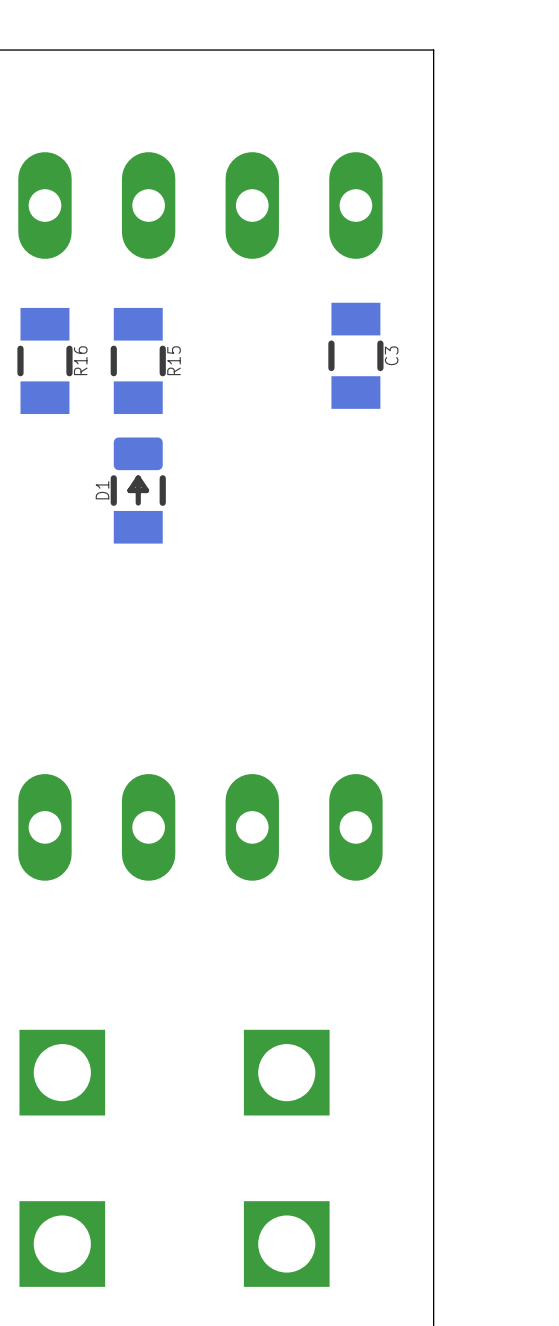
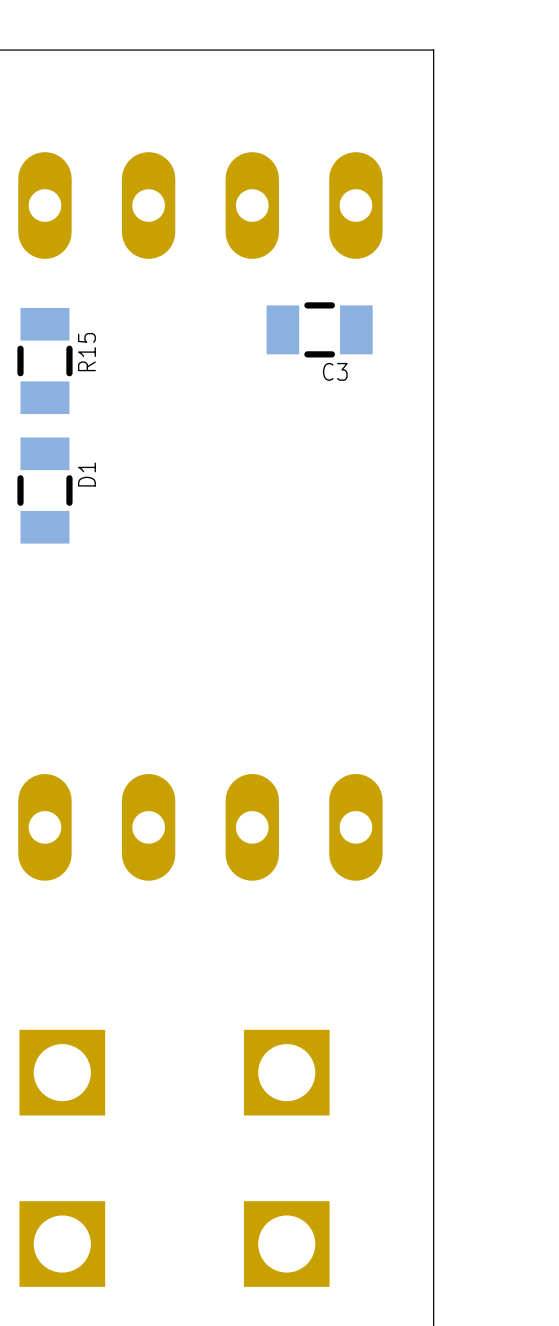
C3 rotation: 0° (355, 355) -> 90° clockwise (319, 329)
R16 name: R16 (80, 360) -> R15 (86, 352)
R15: (138, 360) -> none
D1 footprint: [110, 437, 166, 544] -> [17, 437, 73, 544]

